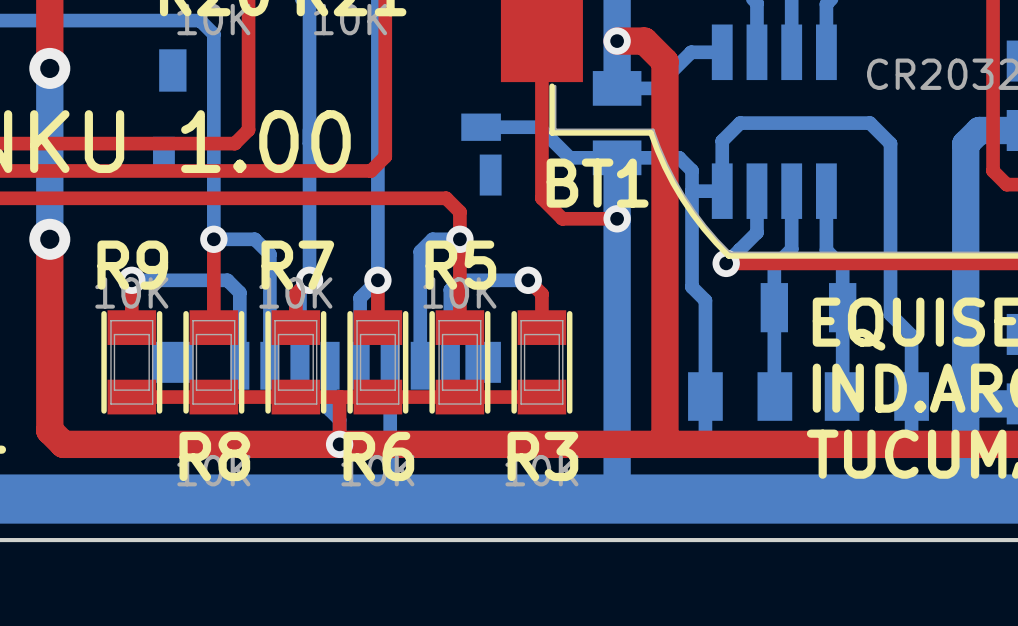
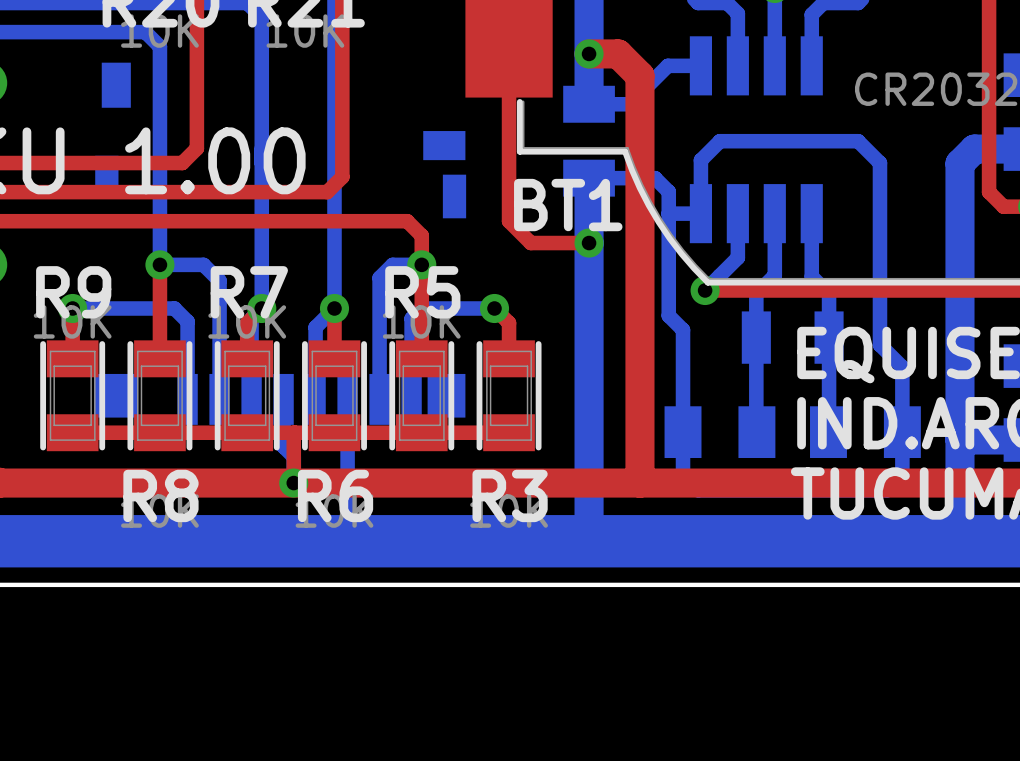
bottom track: (481, 127) (539, 127) (569, 157) (617, 157) -> none

